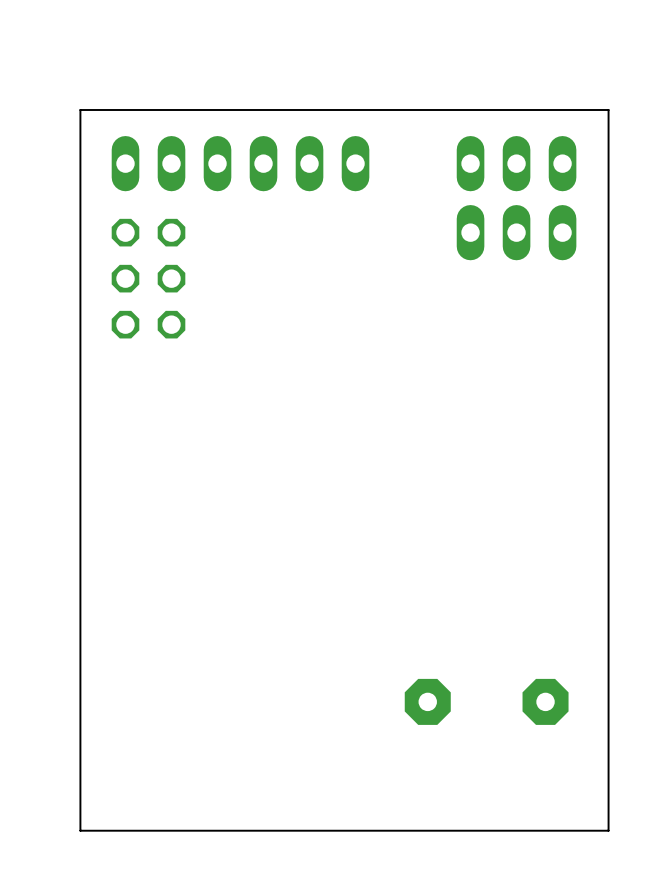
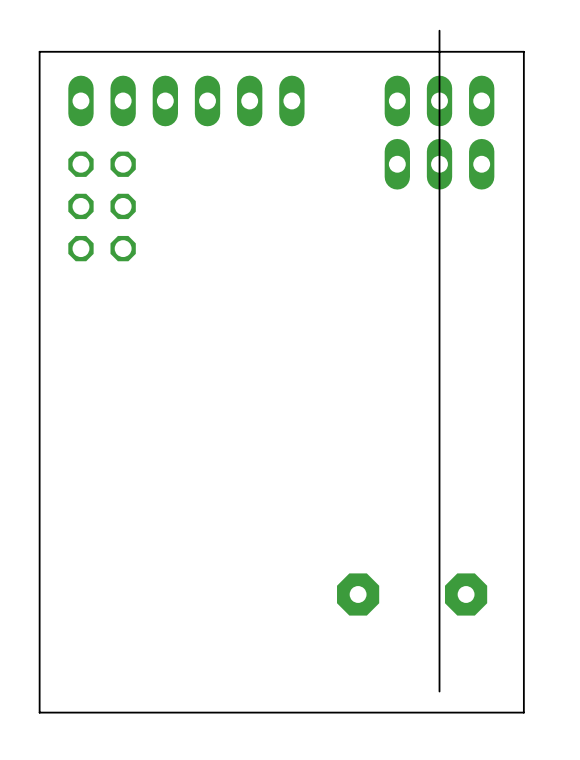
board edge: none -> (439, 30) (439, 691)

